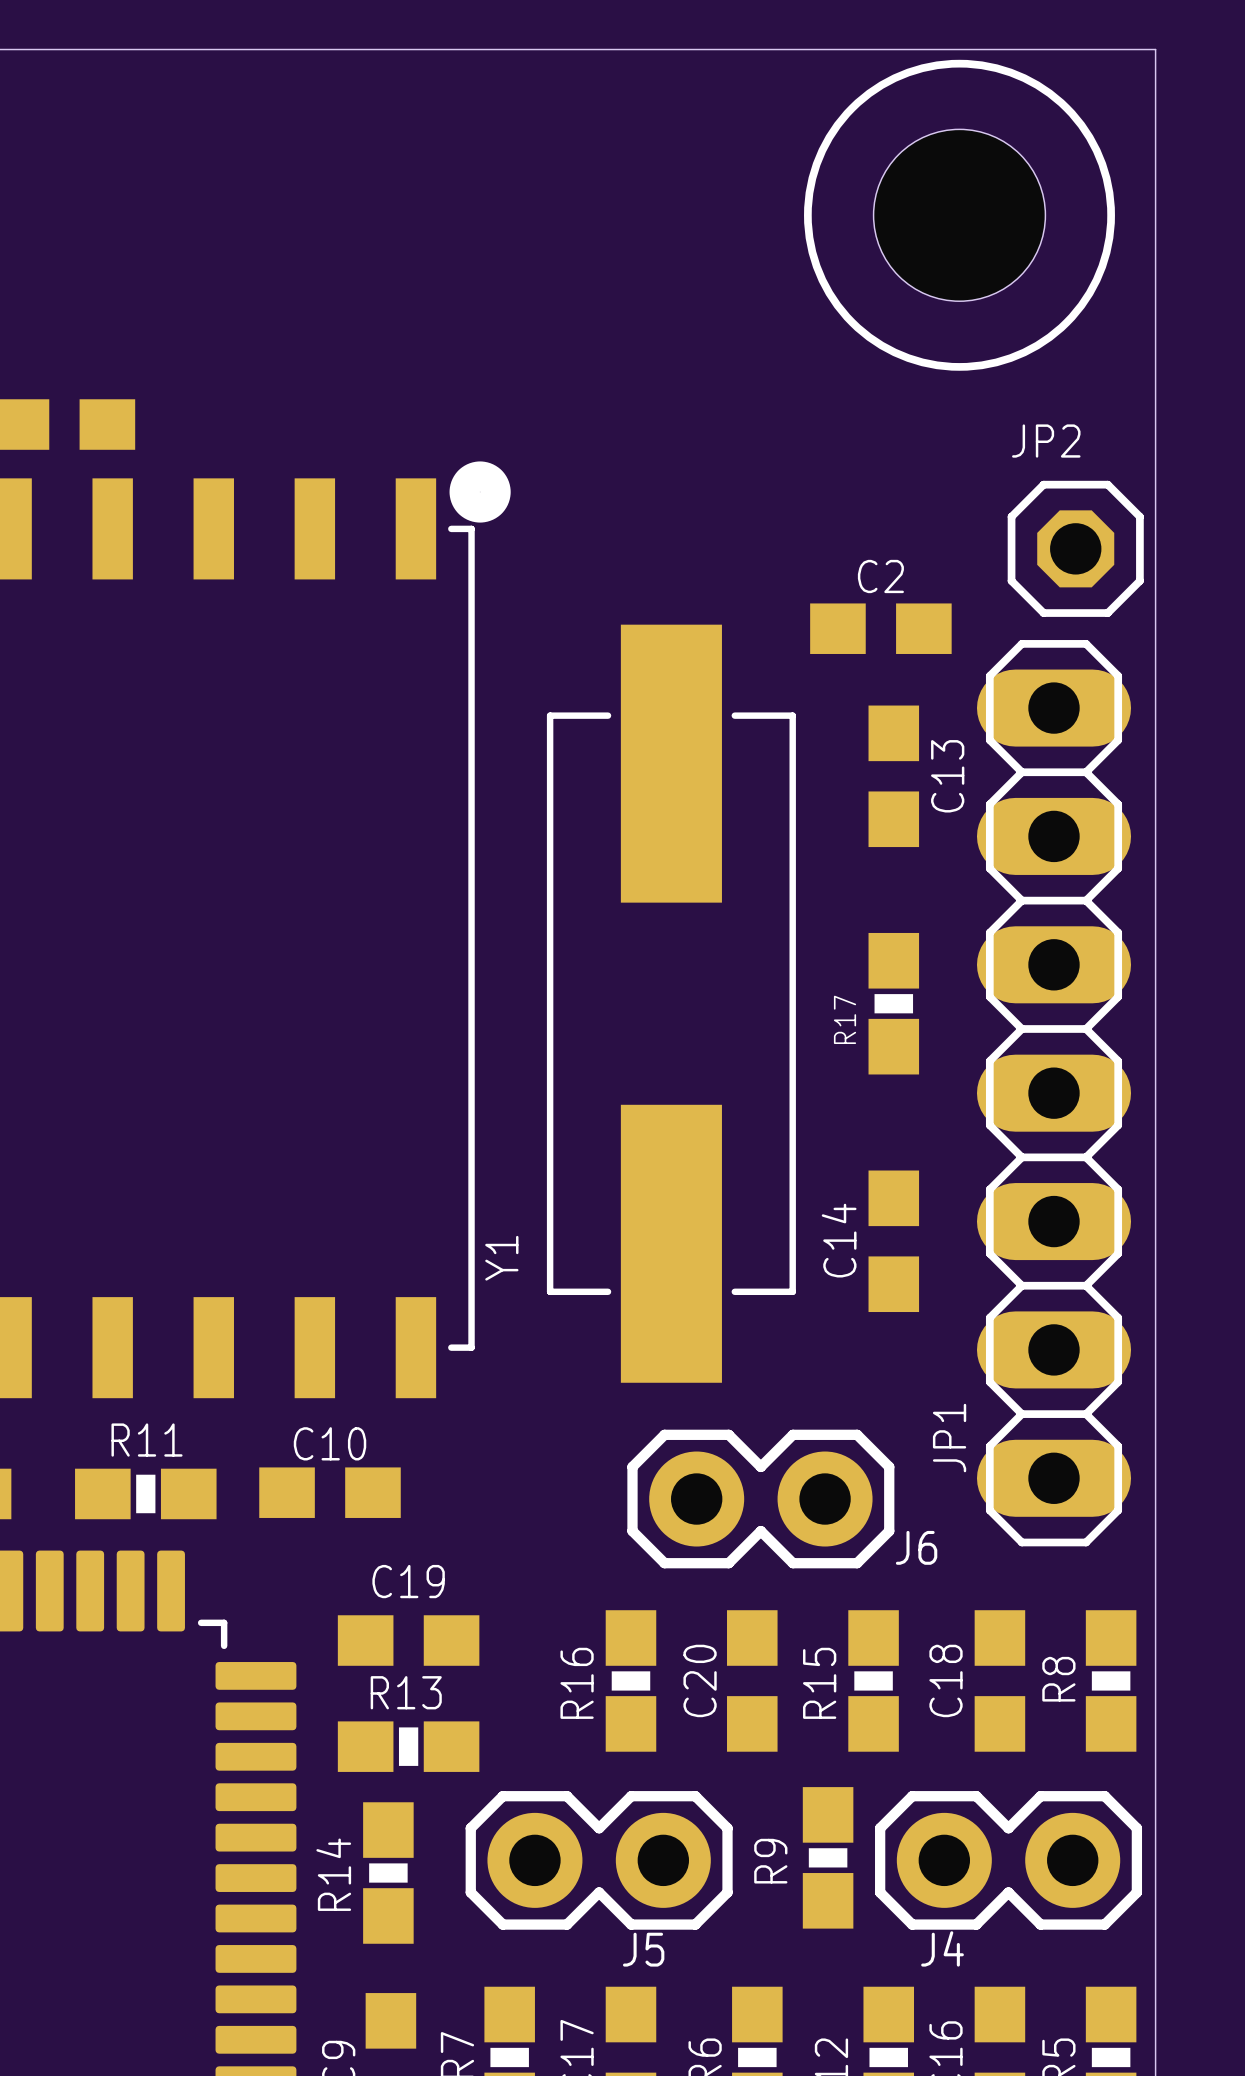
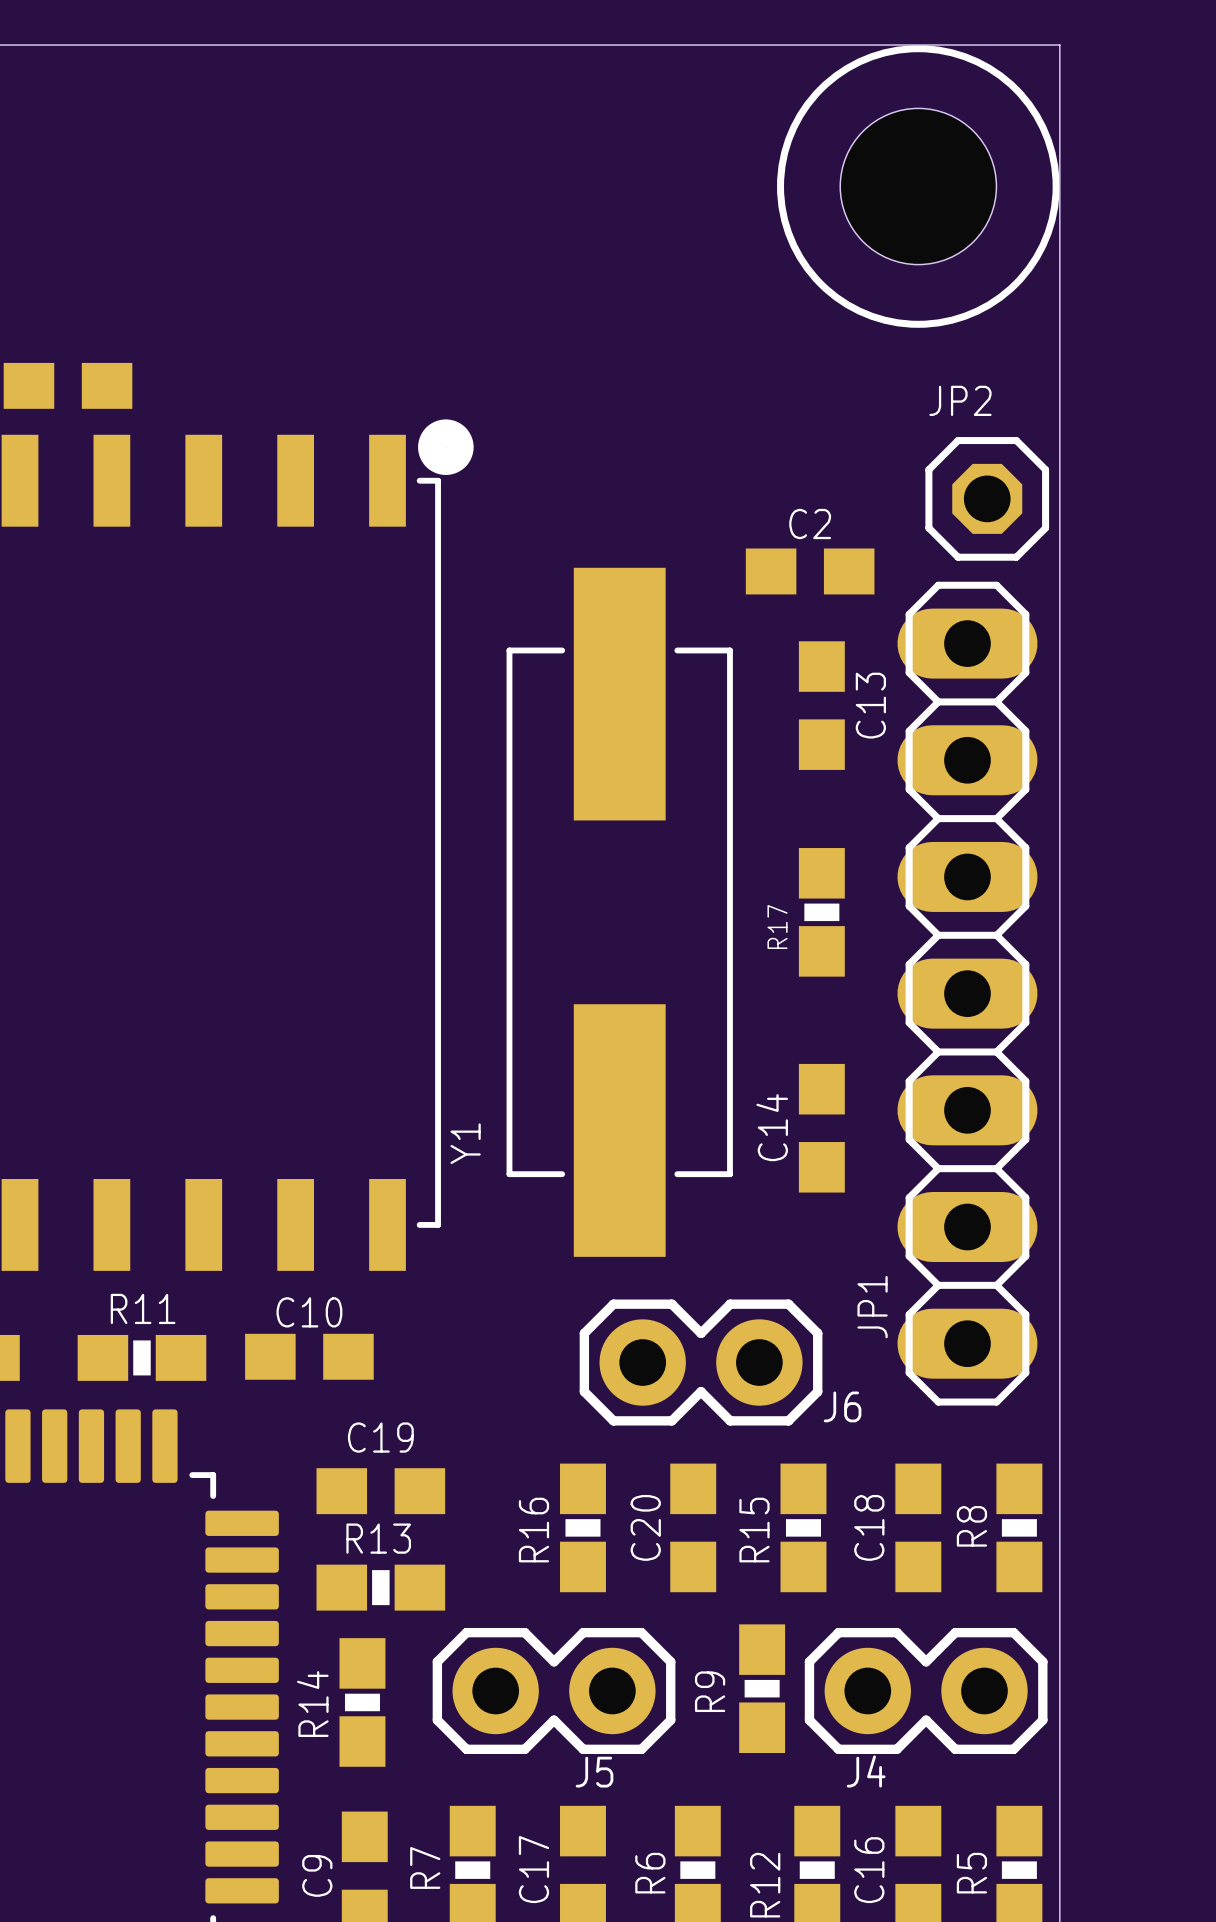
drawing position: (959, 215) -> (918, 186)
hole position: (959, 215) -> (918, 186)

